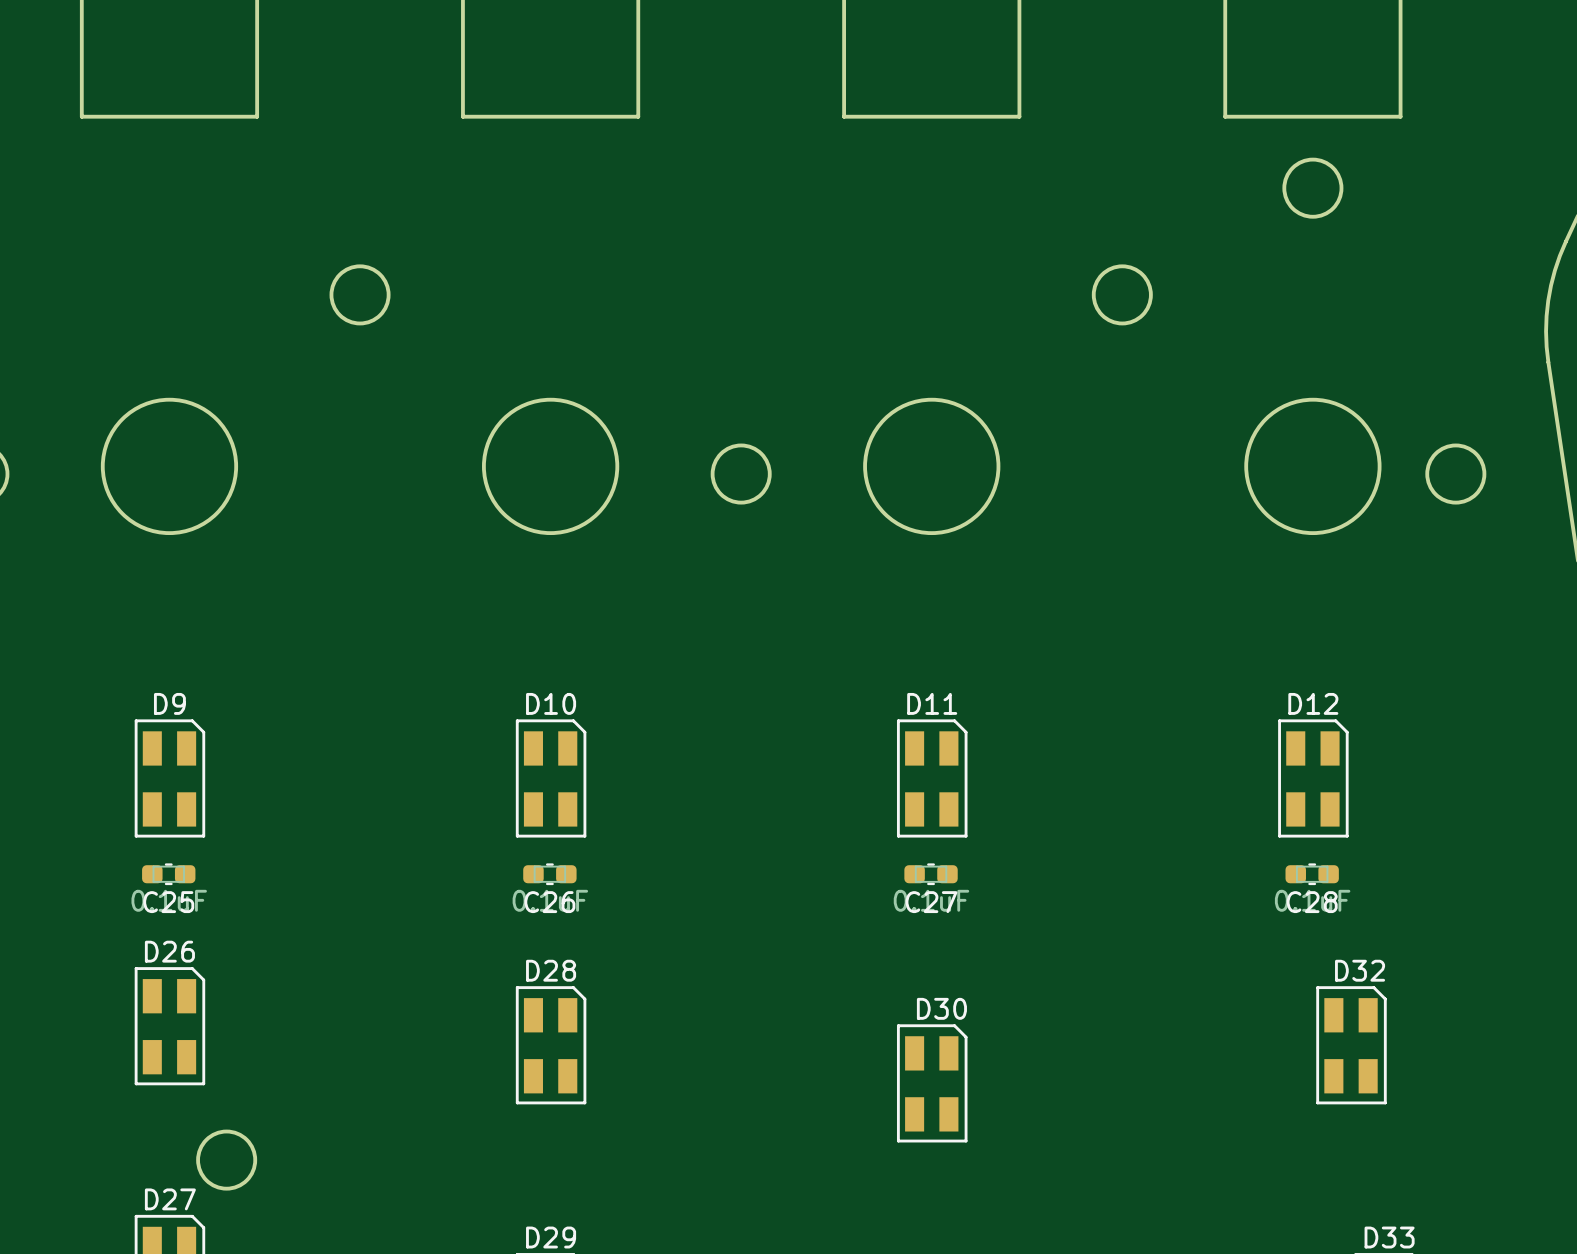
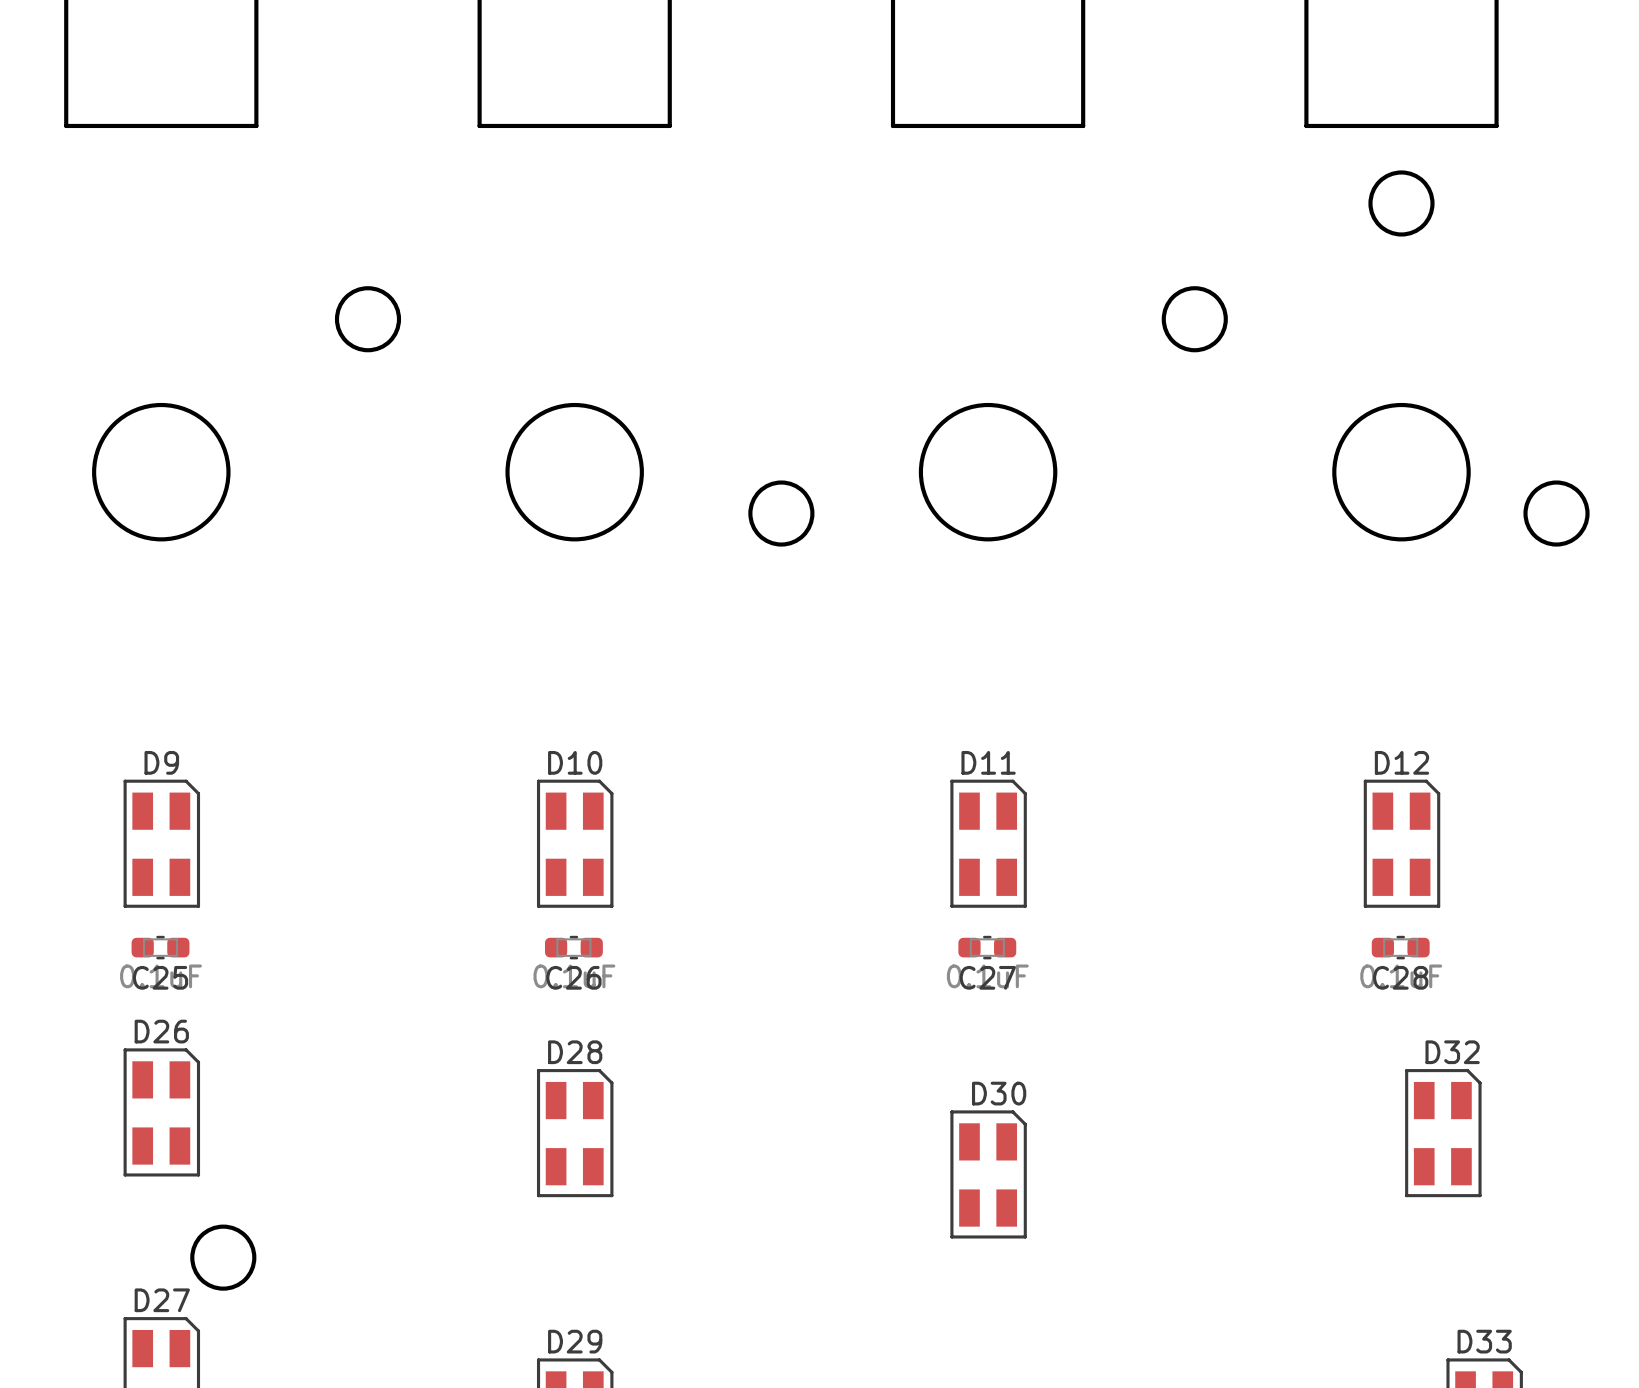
round board edge: none -> [92, 402, 231, 542]
round board edge: none -> [505, 402, 644, 542]
round board edge: none -> [918, 402, 1058, 542]
round board edge: none -> [1332, 402, 1471, 542]
round board edge: [100, 397, 239, 536] -> none
round board edge: [482, 397, 620, 536] -> none
round board edge: [863, 397, 1001, 536] -> none
round board edge: [1244, 397, 1382, 536] -> none

